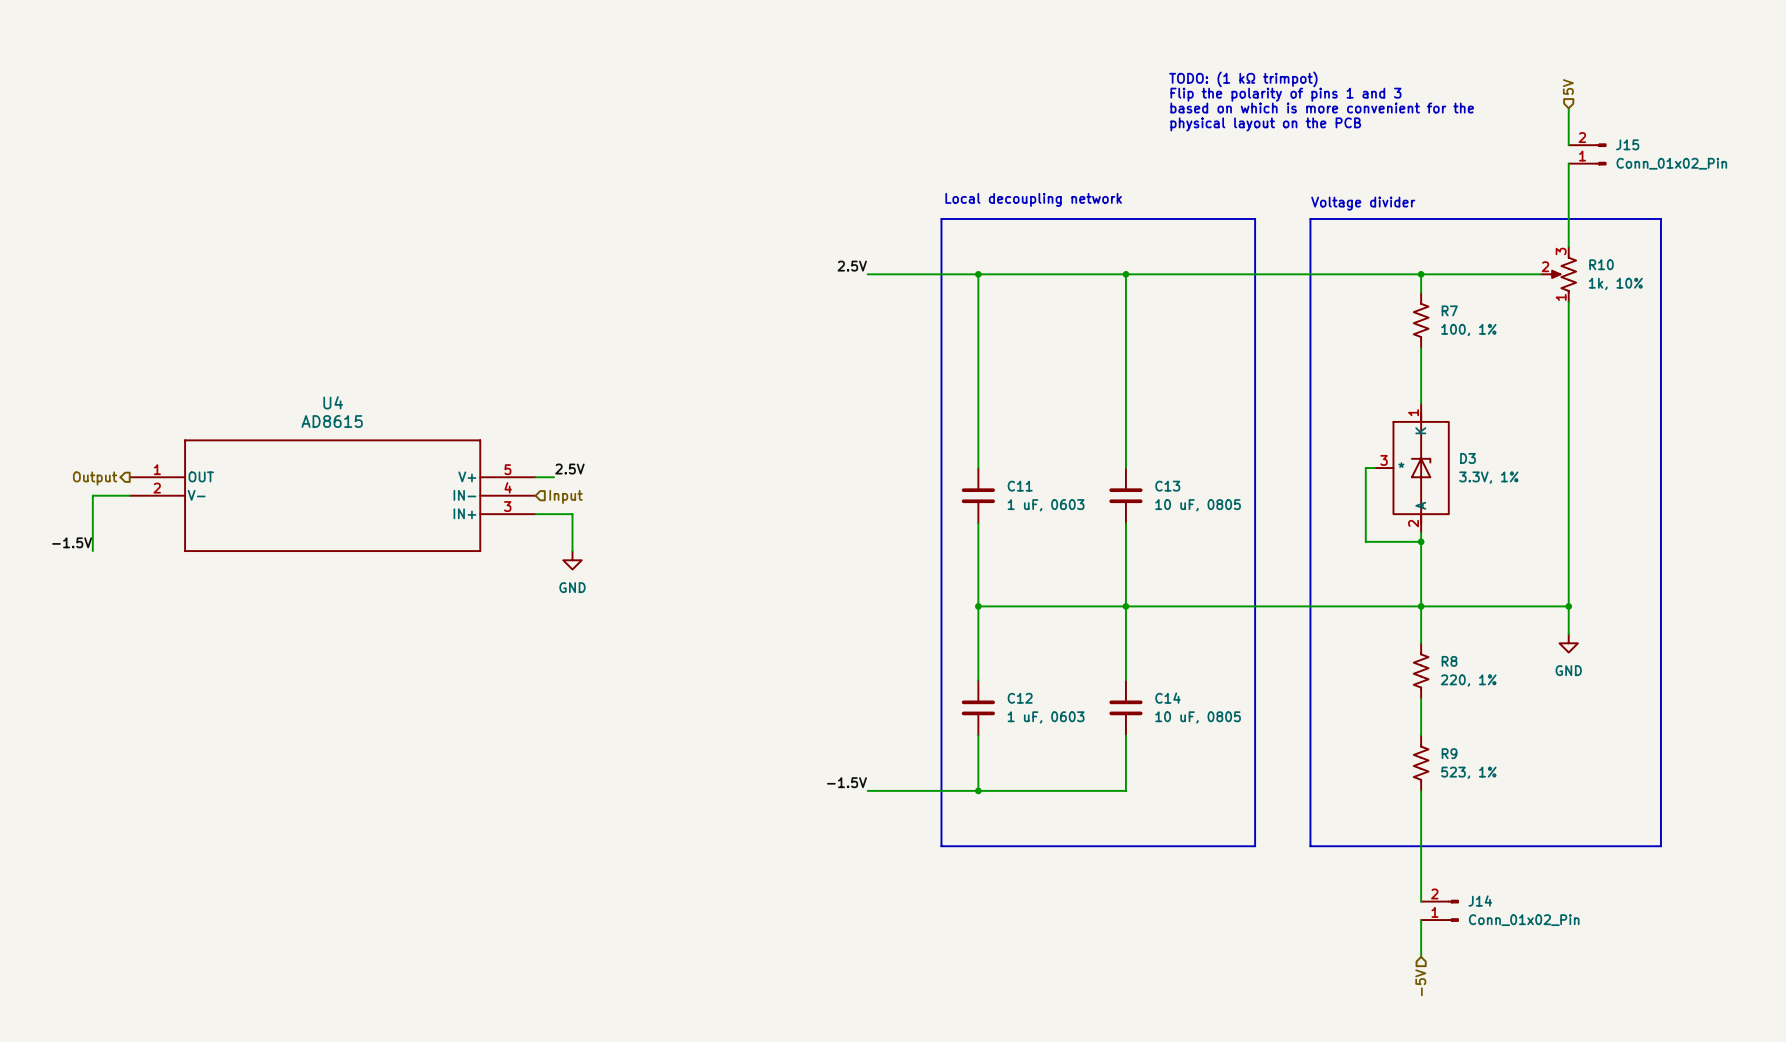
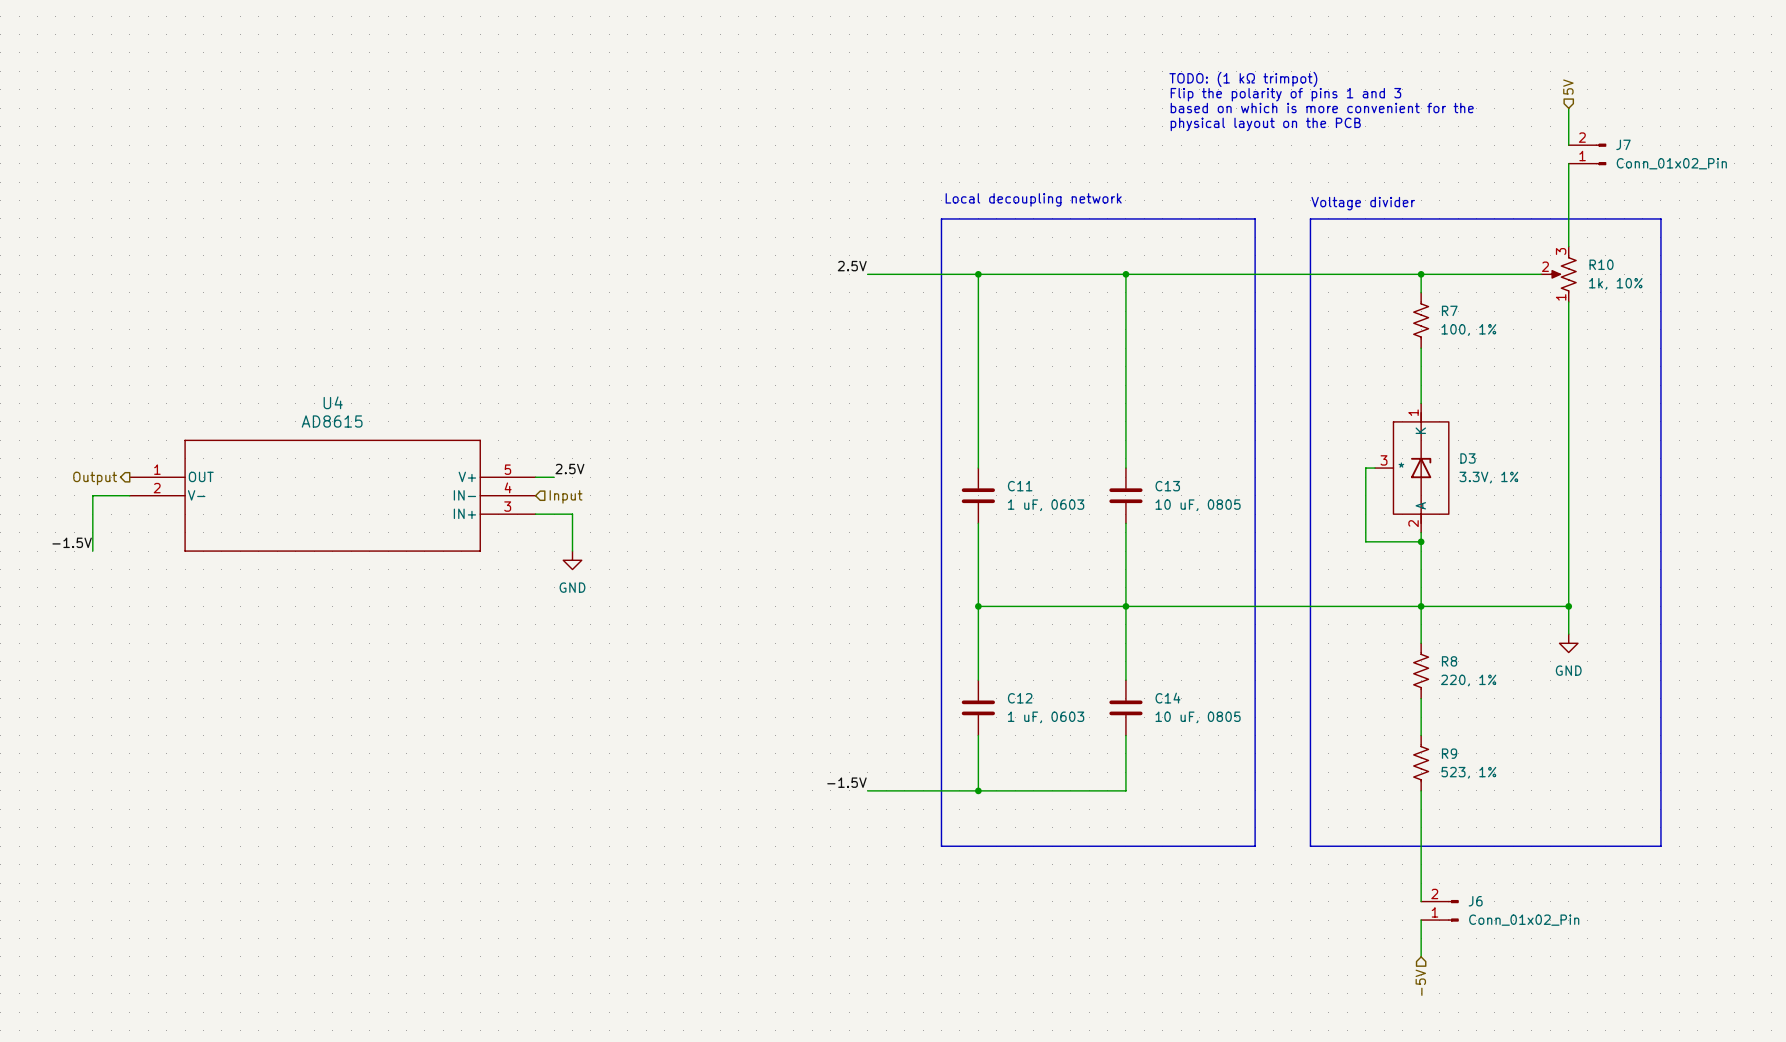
J15 name: J15 (1627, 144) -> J7 (1623, 144)
J14 name: J14 (1480, 901) -> J6 (1475, 901)

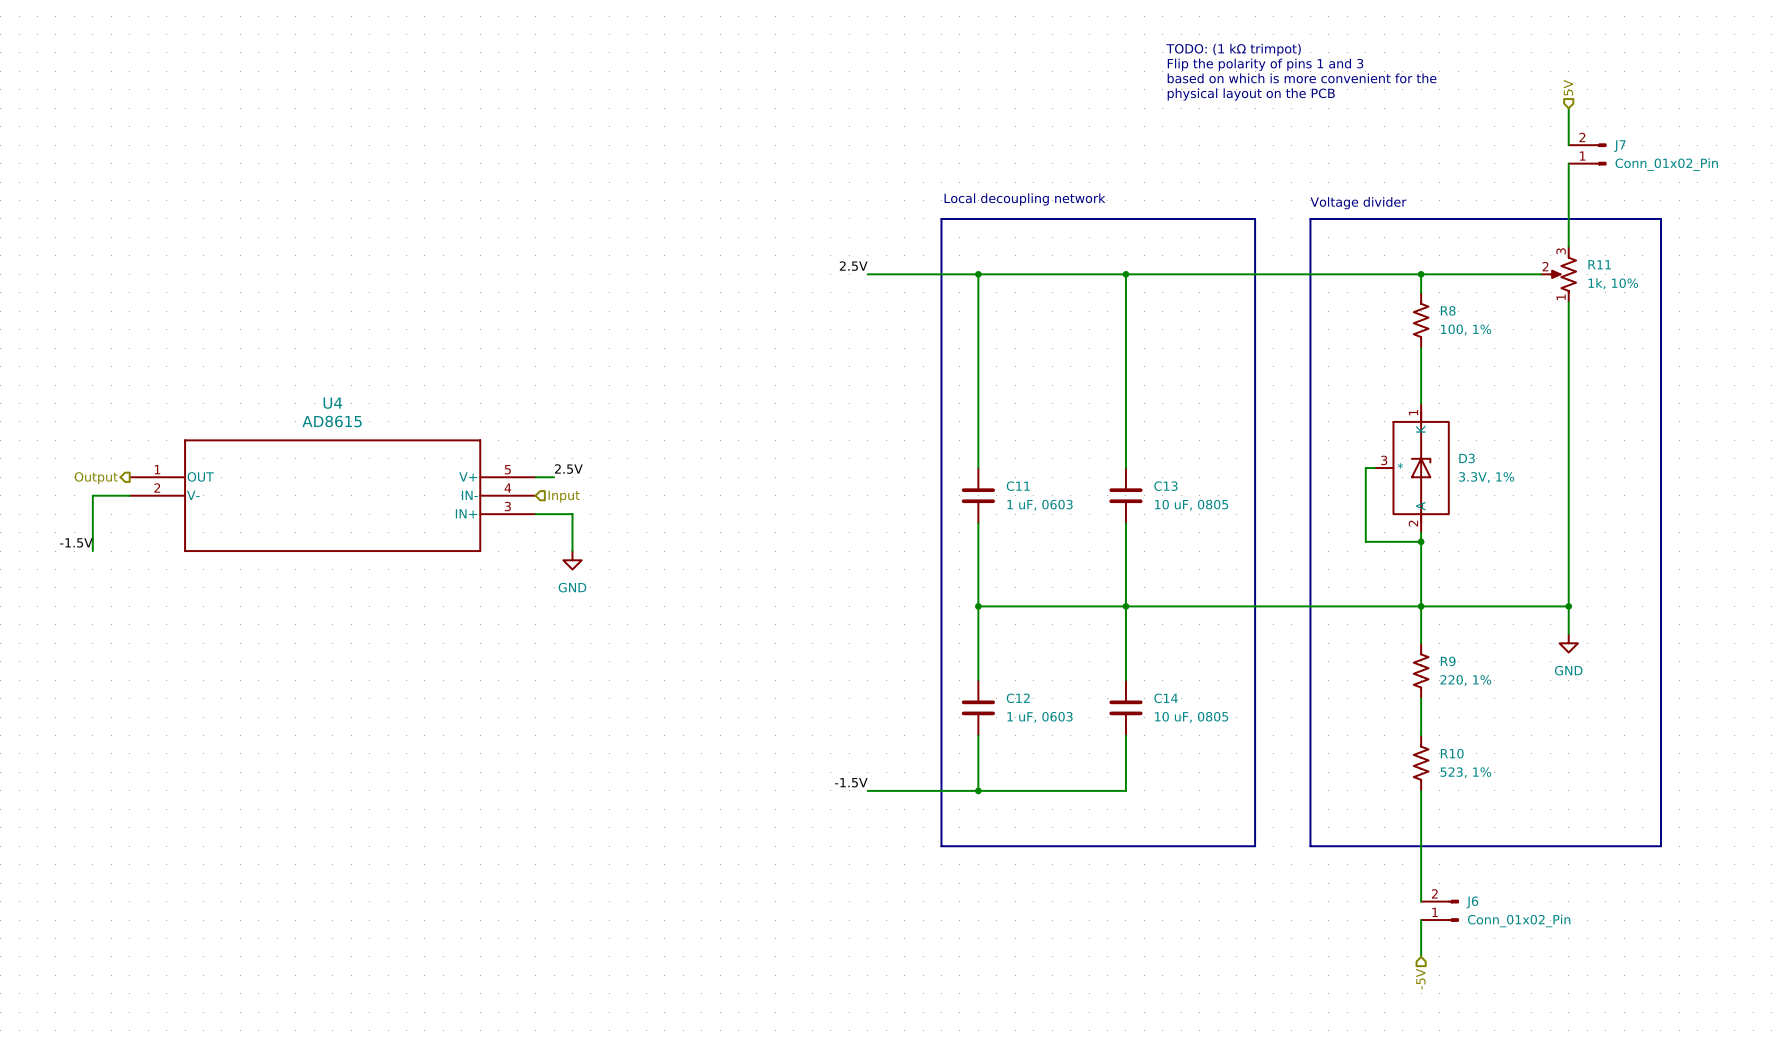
text: none -> TODO: (1 kΩ trimpot) (1233, 49)
text: none -> Flip the polarity of pins 1 and 3 (1265, 64)
text: TODO: (1 kΩ trimpot) (1243, 79) -> based on which is more convenient for the (1302, 78)
text: Flip the polarity of pins 1 and 3 (1285, 94) -> physical layout on the PCB (1251, 94)
text: based on which is more convenient for the (1322, 108) -> none
text: physical layout on the PCB (1265, 124) -> none
R10 name: R10 (1601, 264) -> R11 (1599, 264)
R7 name: R7 (1449, 310) -> R8 (1448, 310)
R8 name: R8 (1449, 661) -> R9 (1448, 661)
R9 name: R9 (1449, 753) -> R10 (1452, 753)

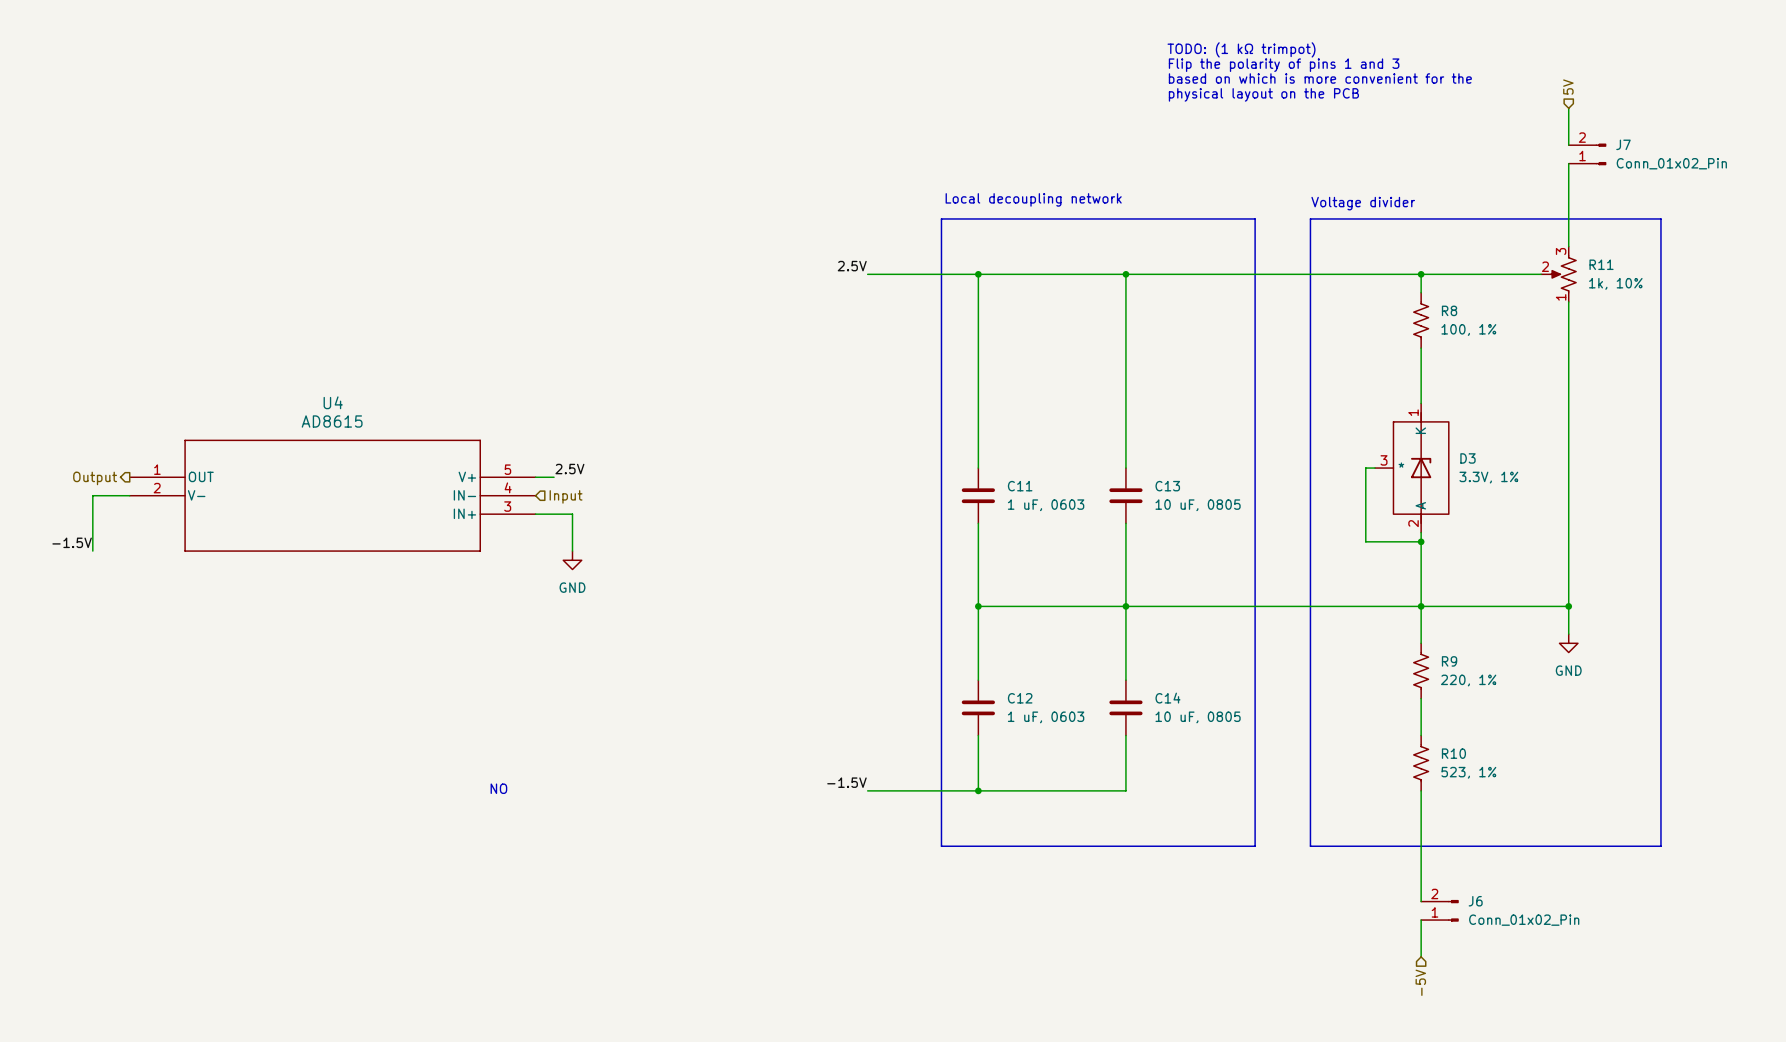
text: none -> NO (498, 788)

